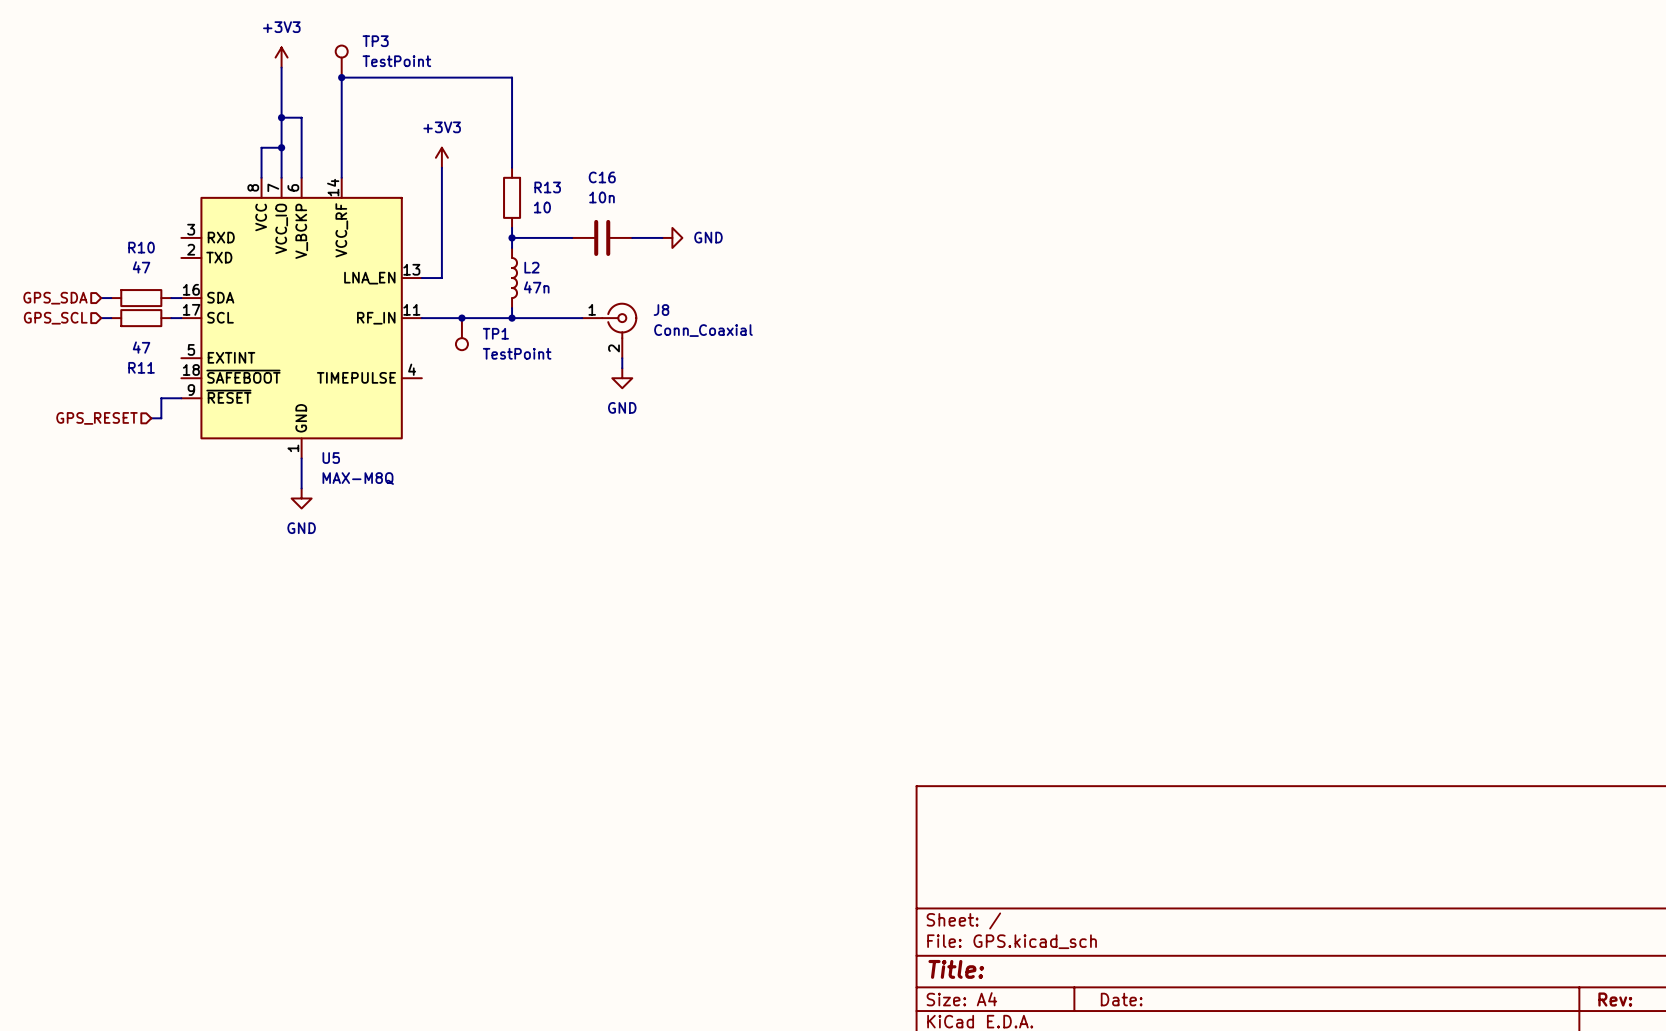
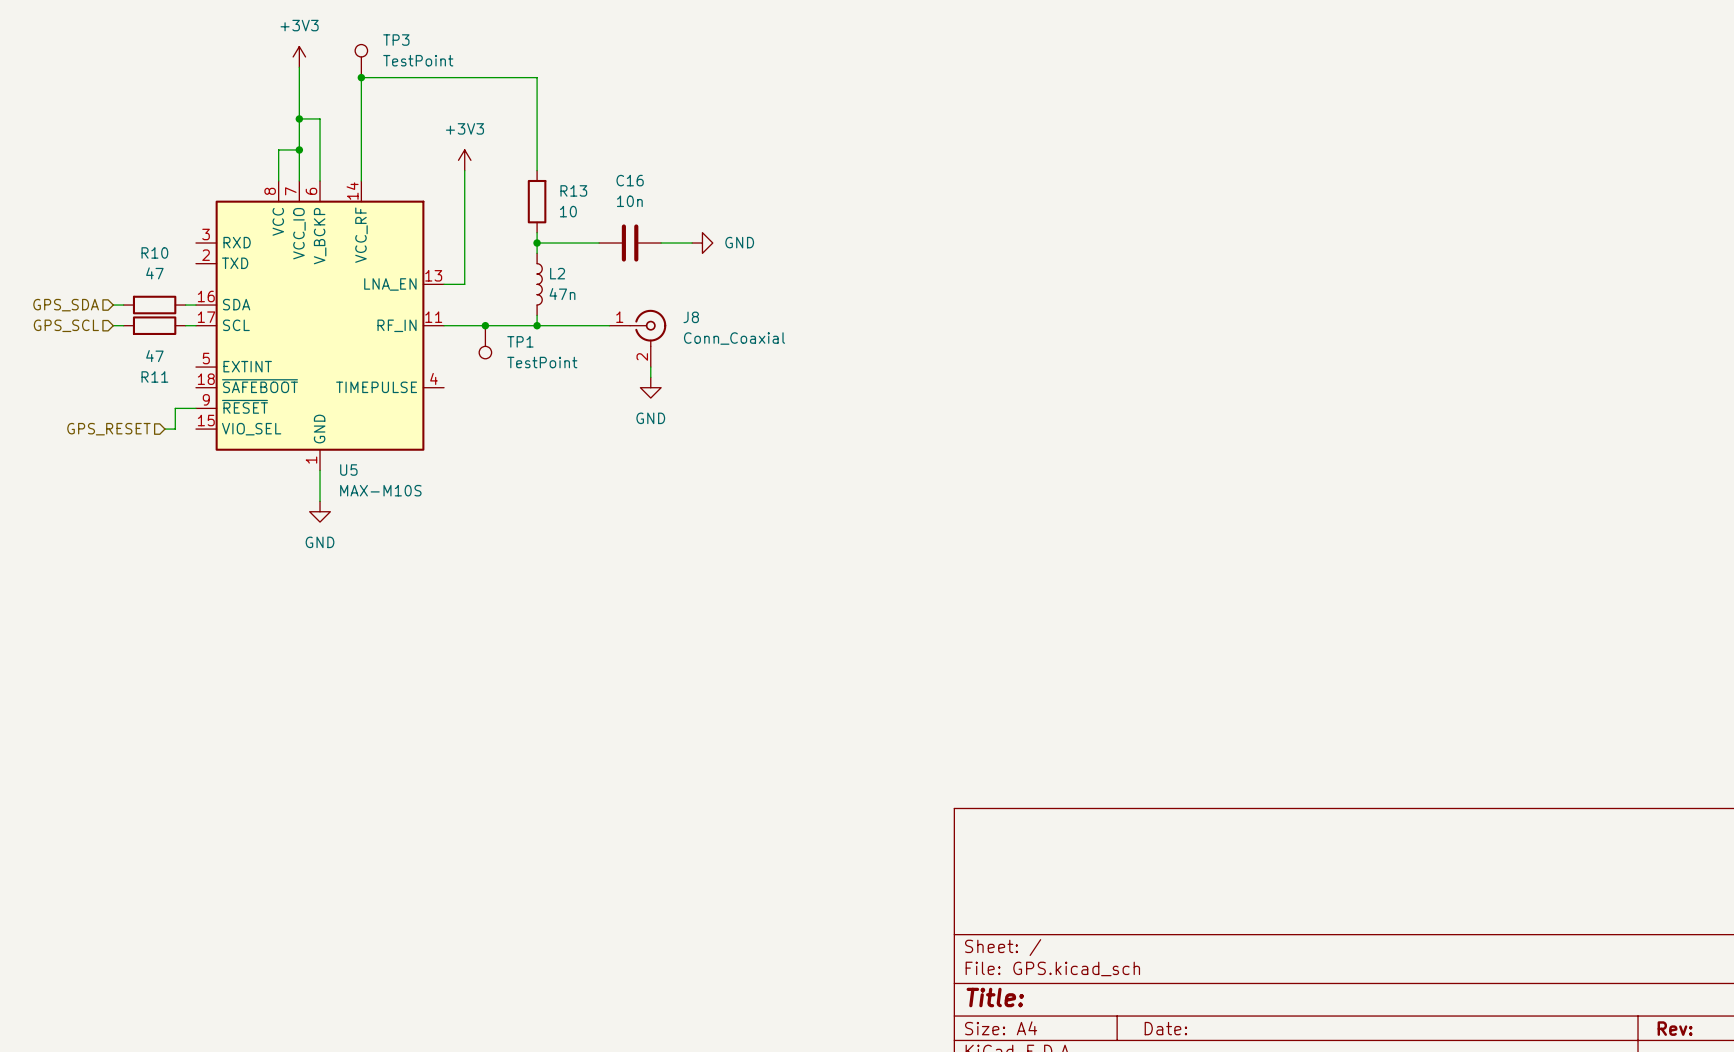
U5 symbol: [181, 177, 422, 459] -> [195, 180, 445, 471]
U5 value: MAX-M8Q (358, 478) -> MAX-M10S (380, 490)

